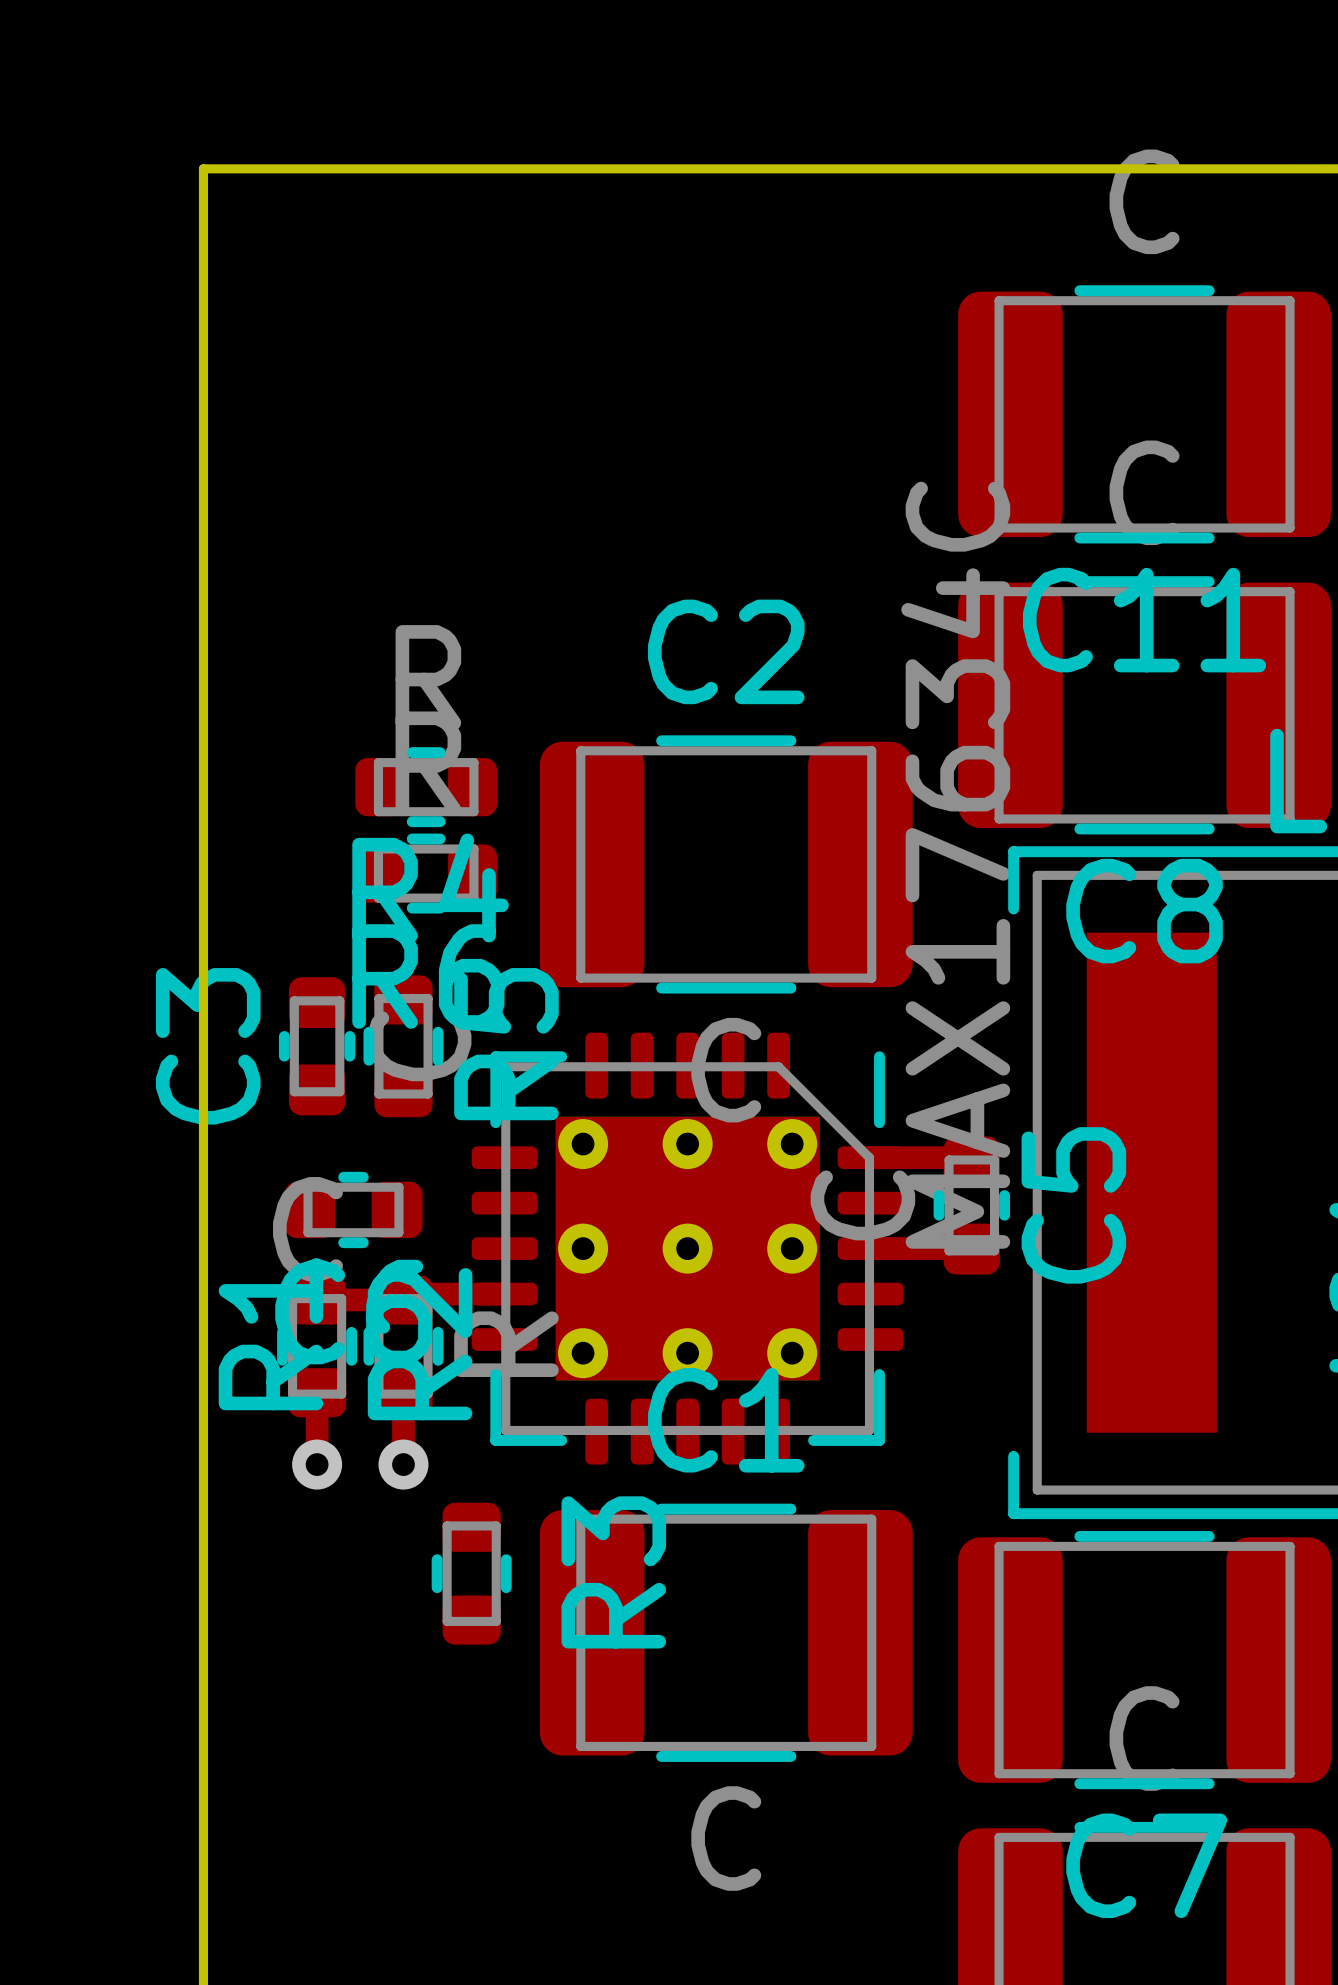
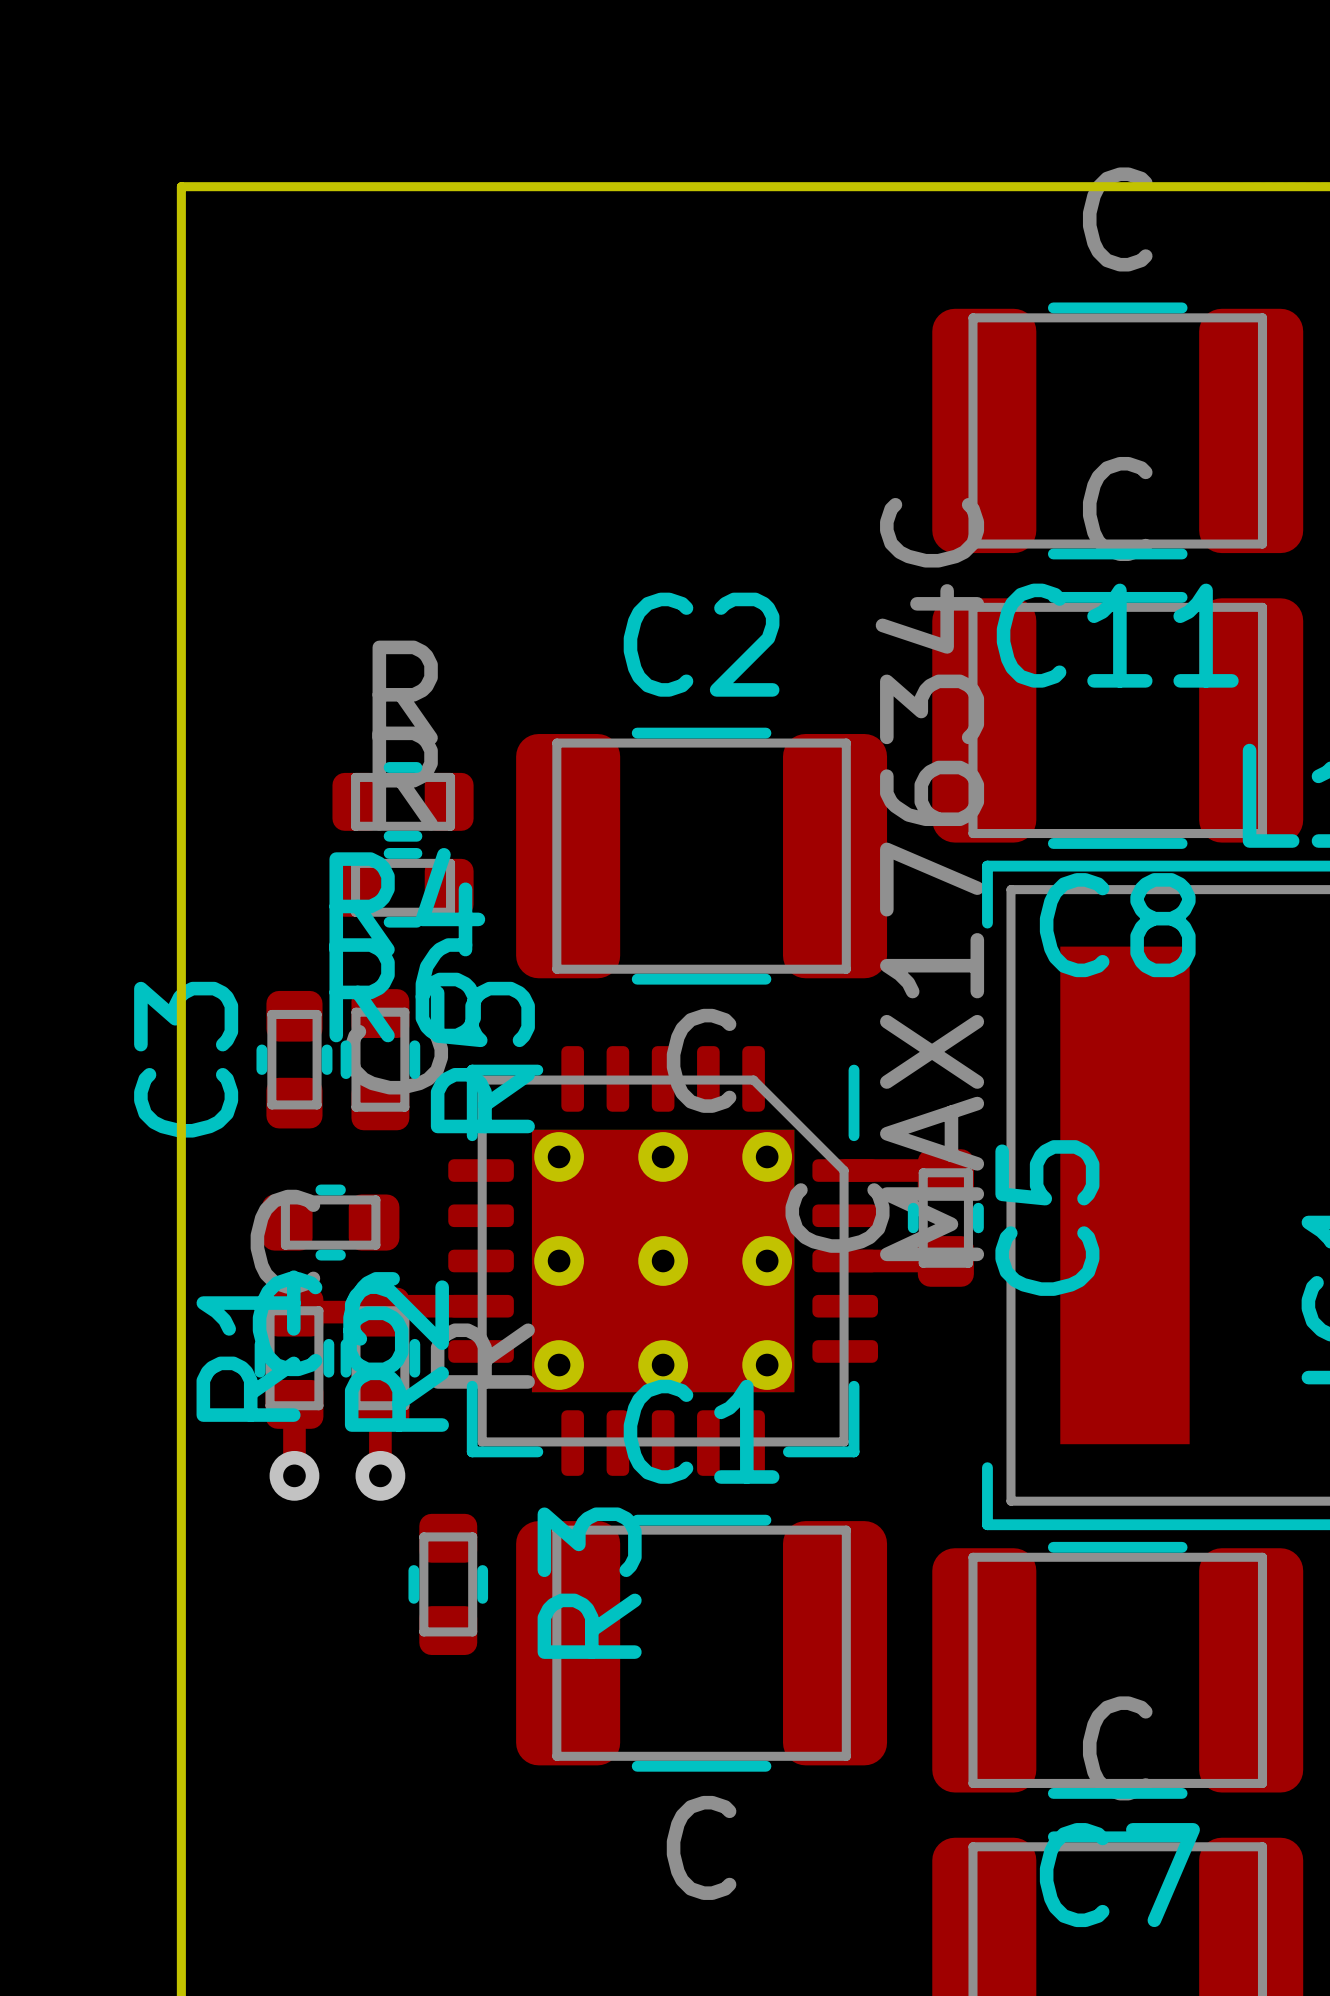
C2 position: (726, 864) -> (701, 856)

